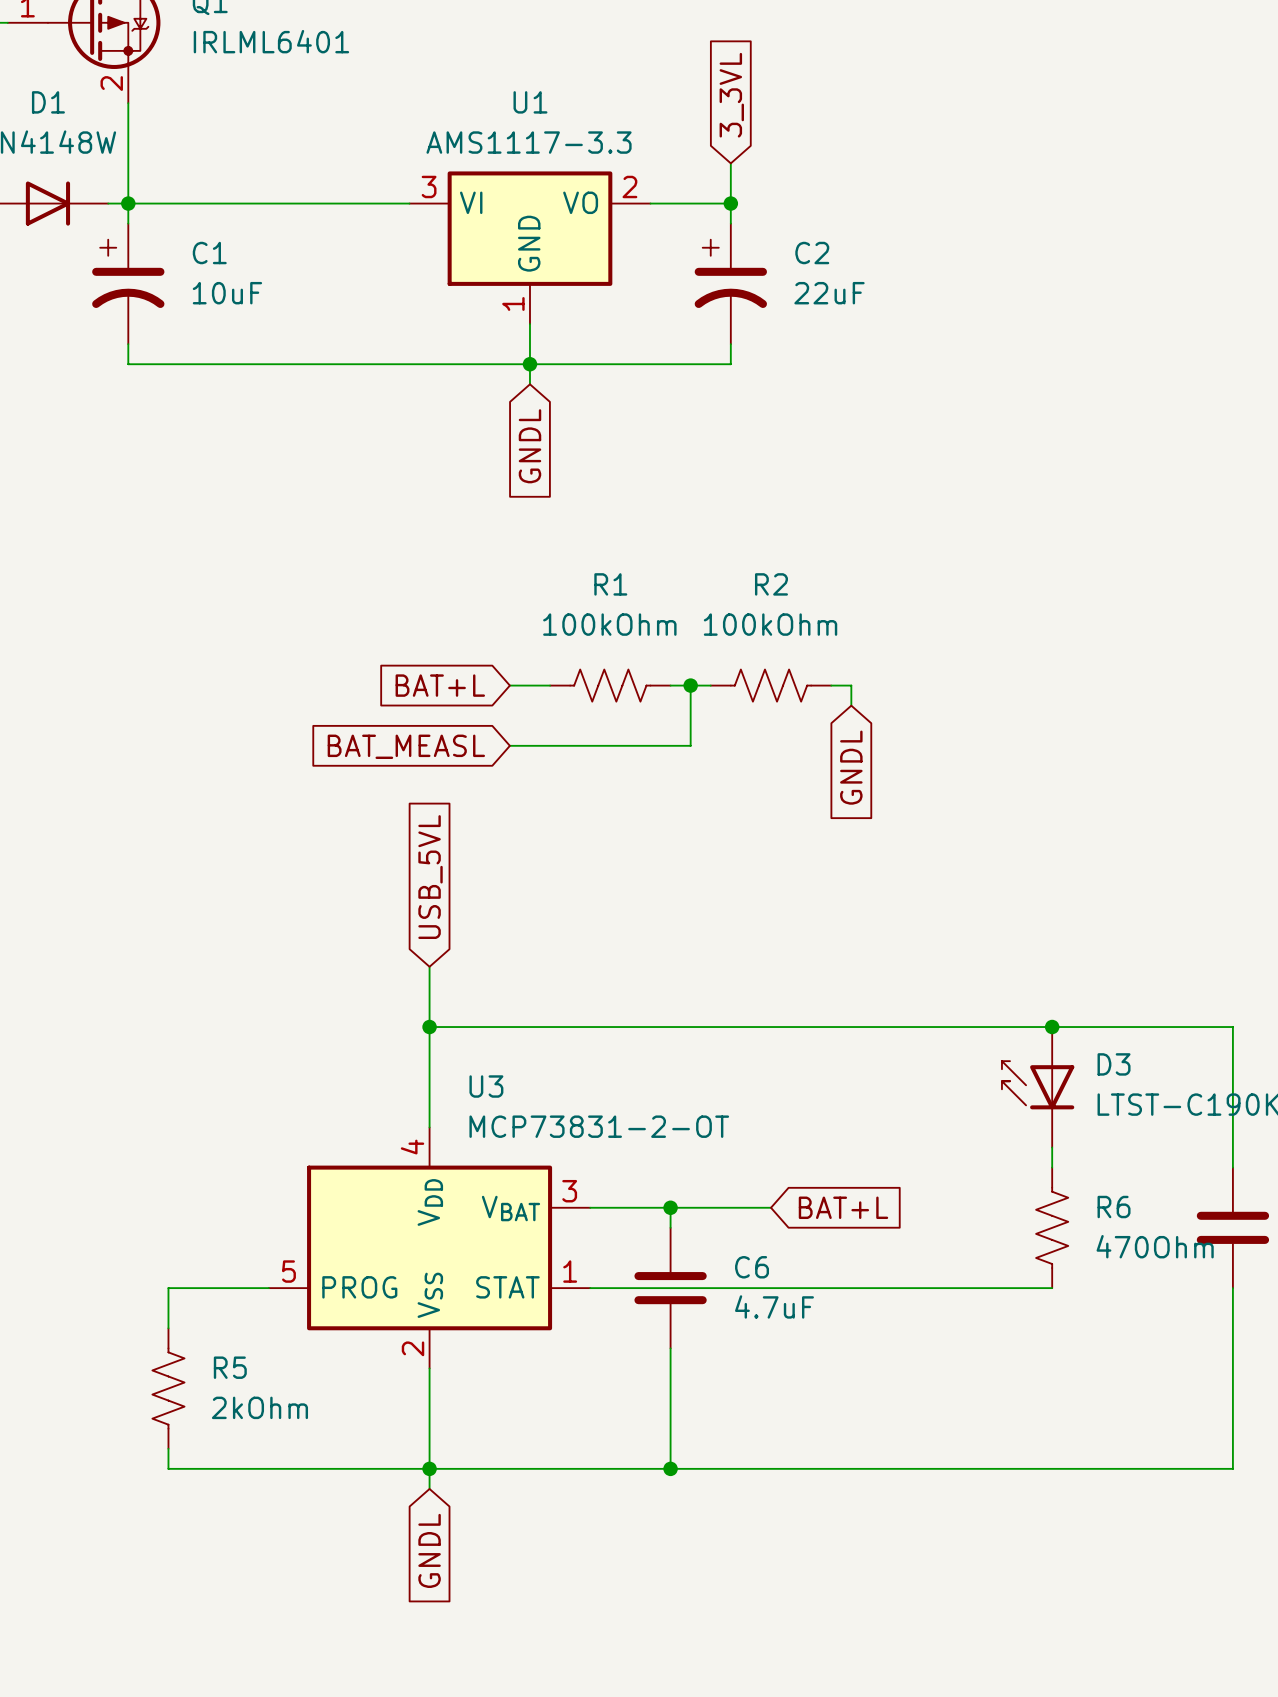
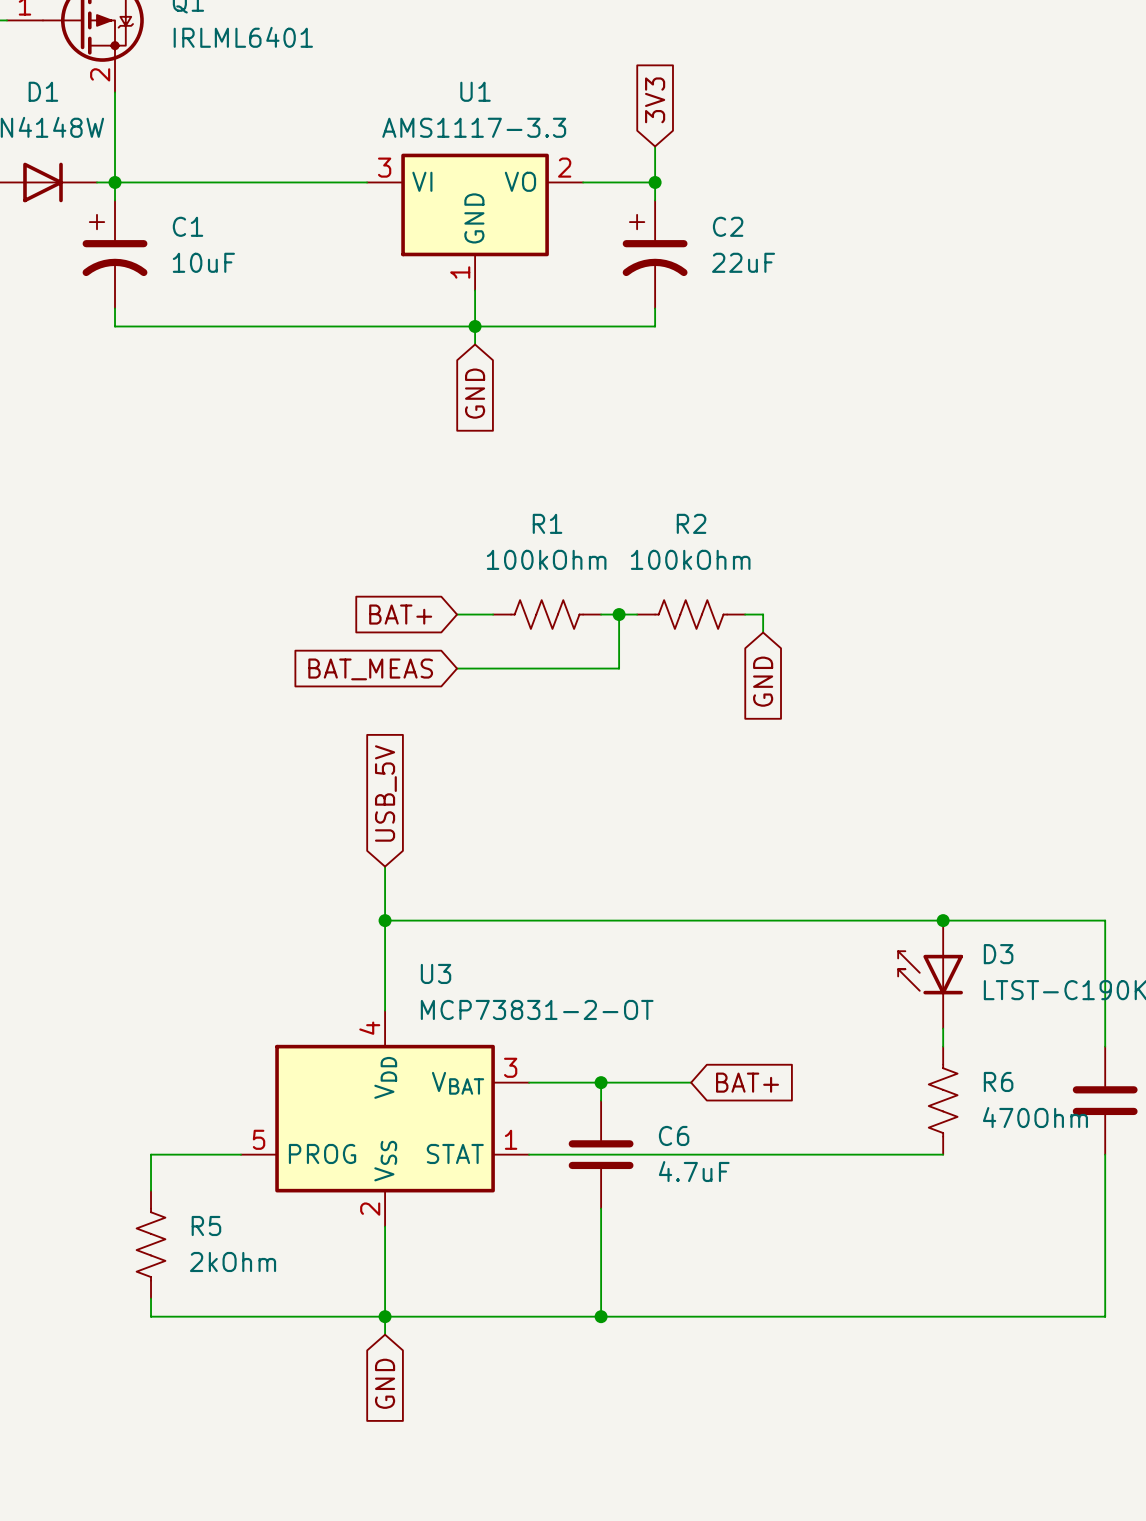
global label: 3_3VL (731, 95) -> 3V3 (655, 100)
global label: GNDL (529, 446) -> GND (475, 393)
global label: BAT+L (440, 685) -> BAT+ (400, 614)
global label: BAT_MEASL (406, 746) -> BAT_MEAS (370, 669)
global label: GNDL (851, 767) -> GND (763, 681)
global label: USB_5VL (430, 877) -> USB_5V (385, 793)
global label: BAT+L (843, 1207) -> BAT+ (747, 1082)
global label: GNDL (429, 1550) -> GND (385, 1383)

